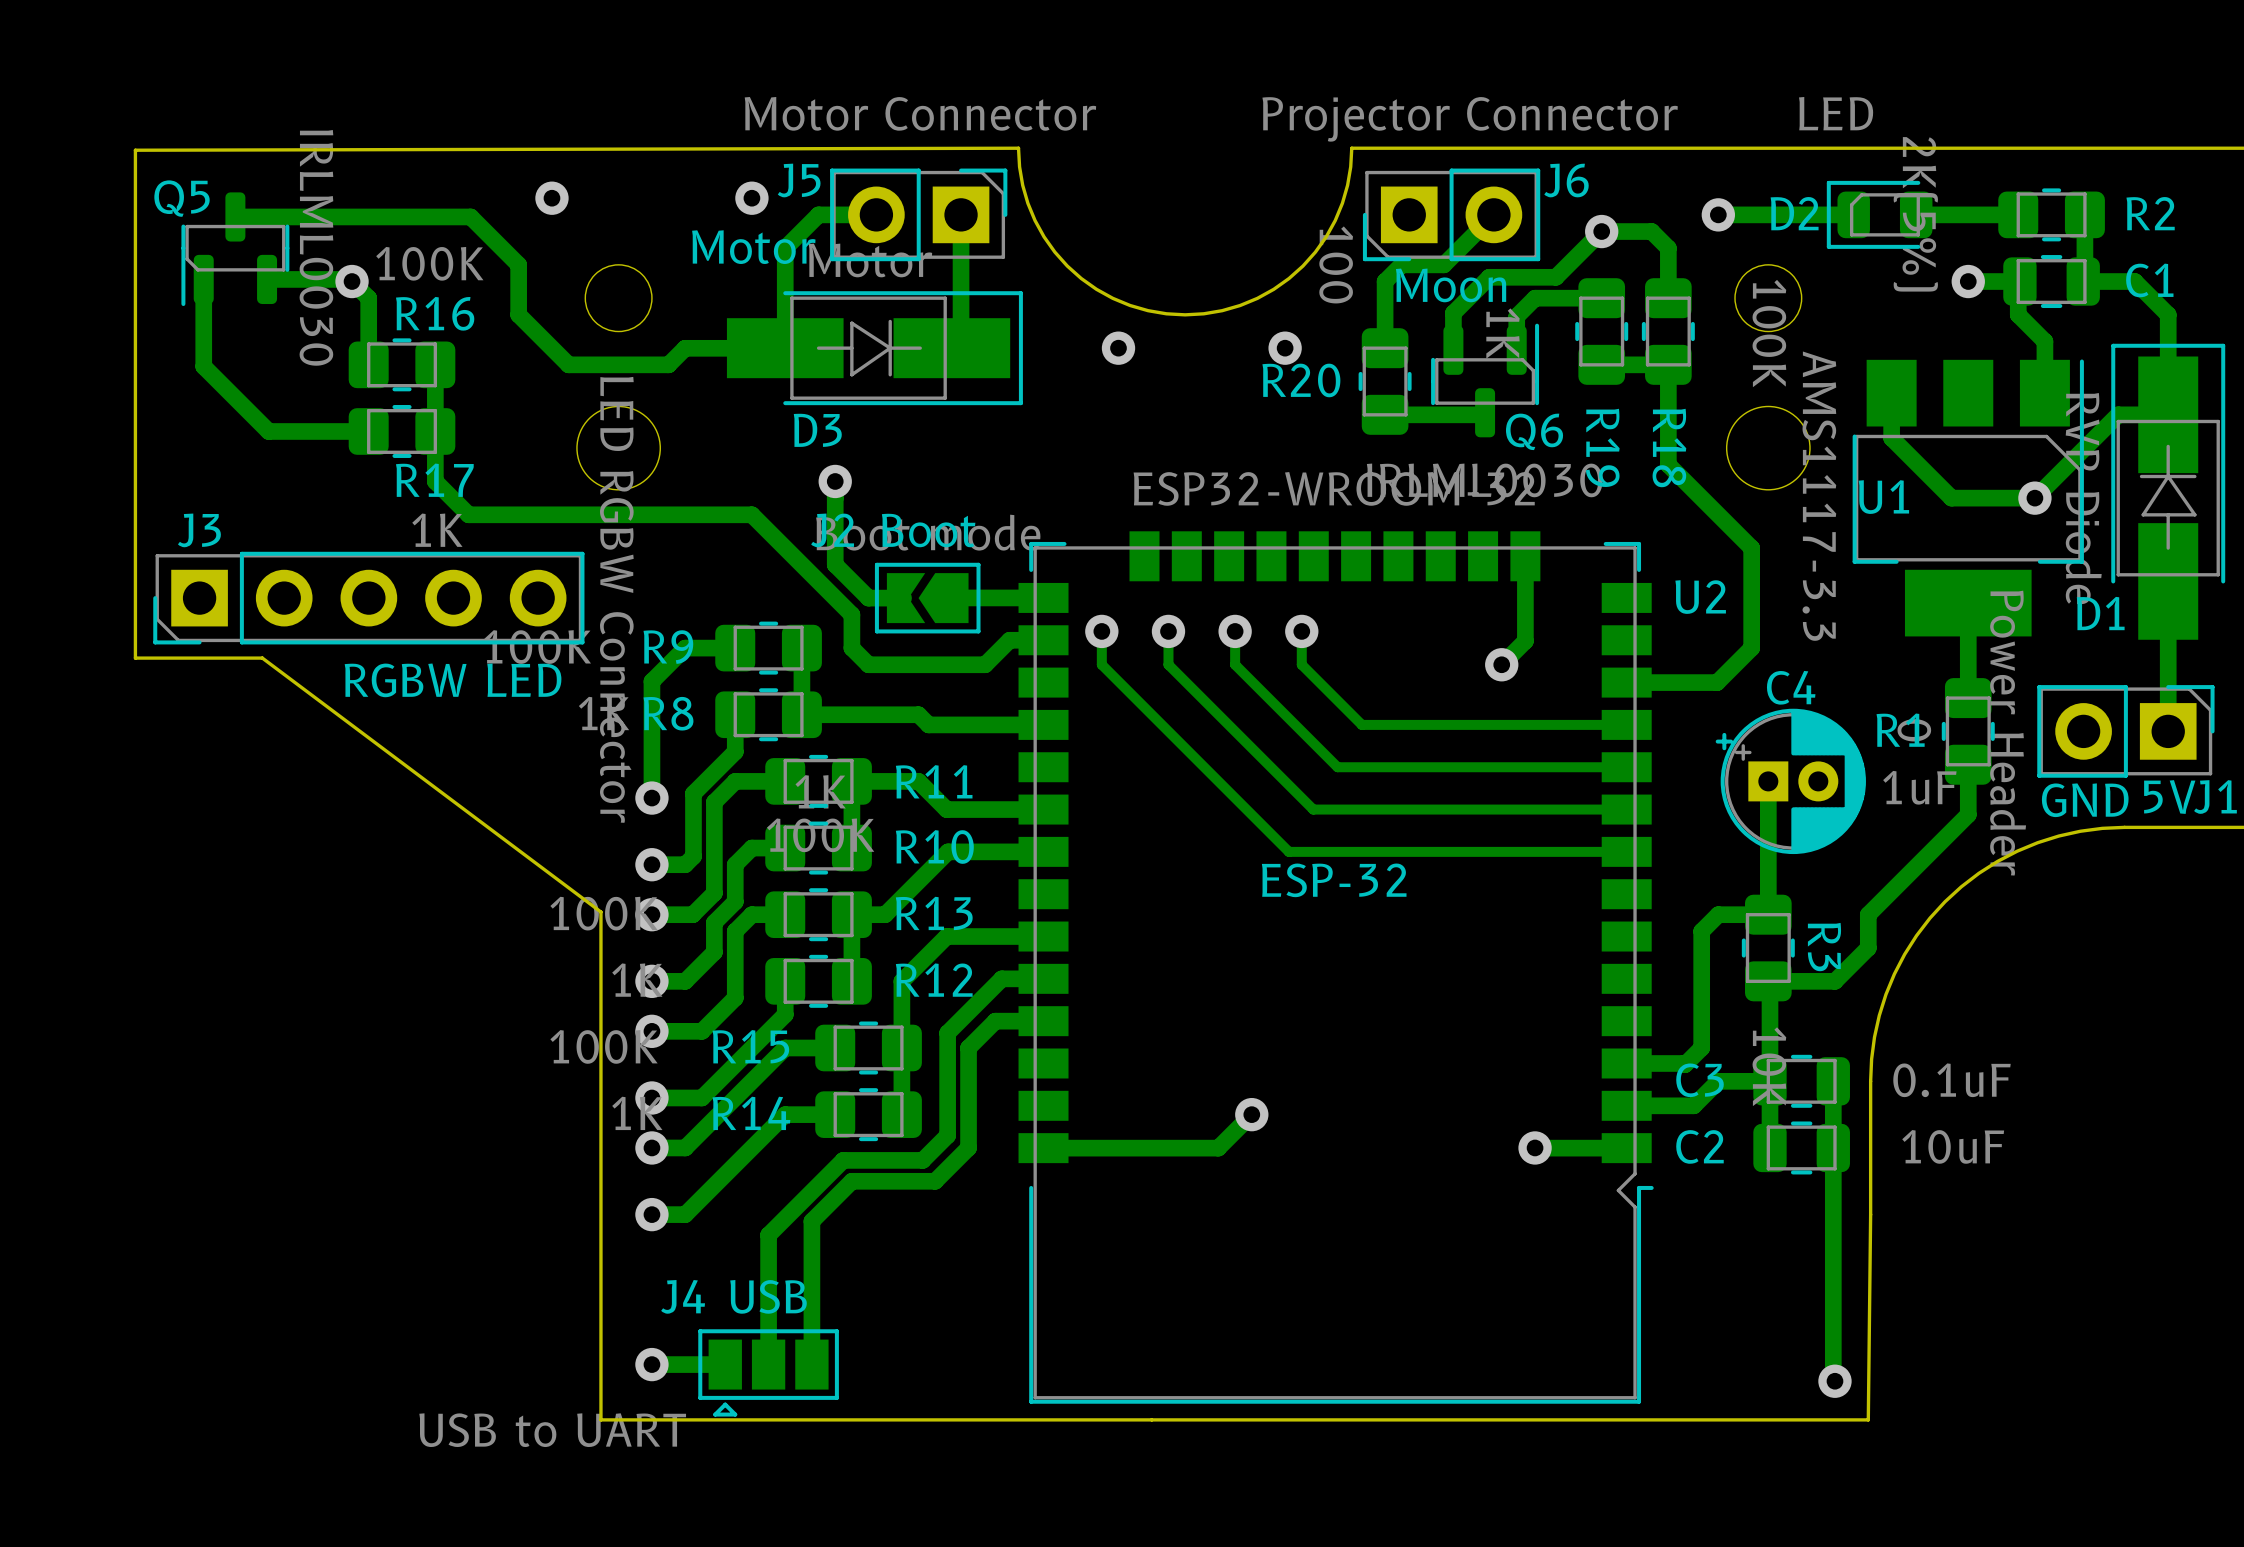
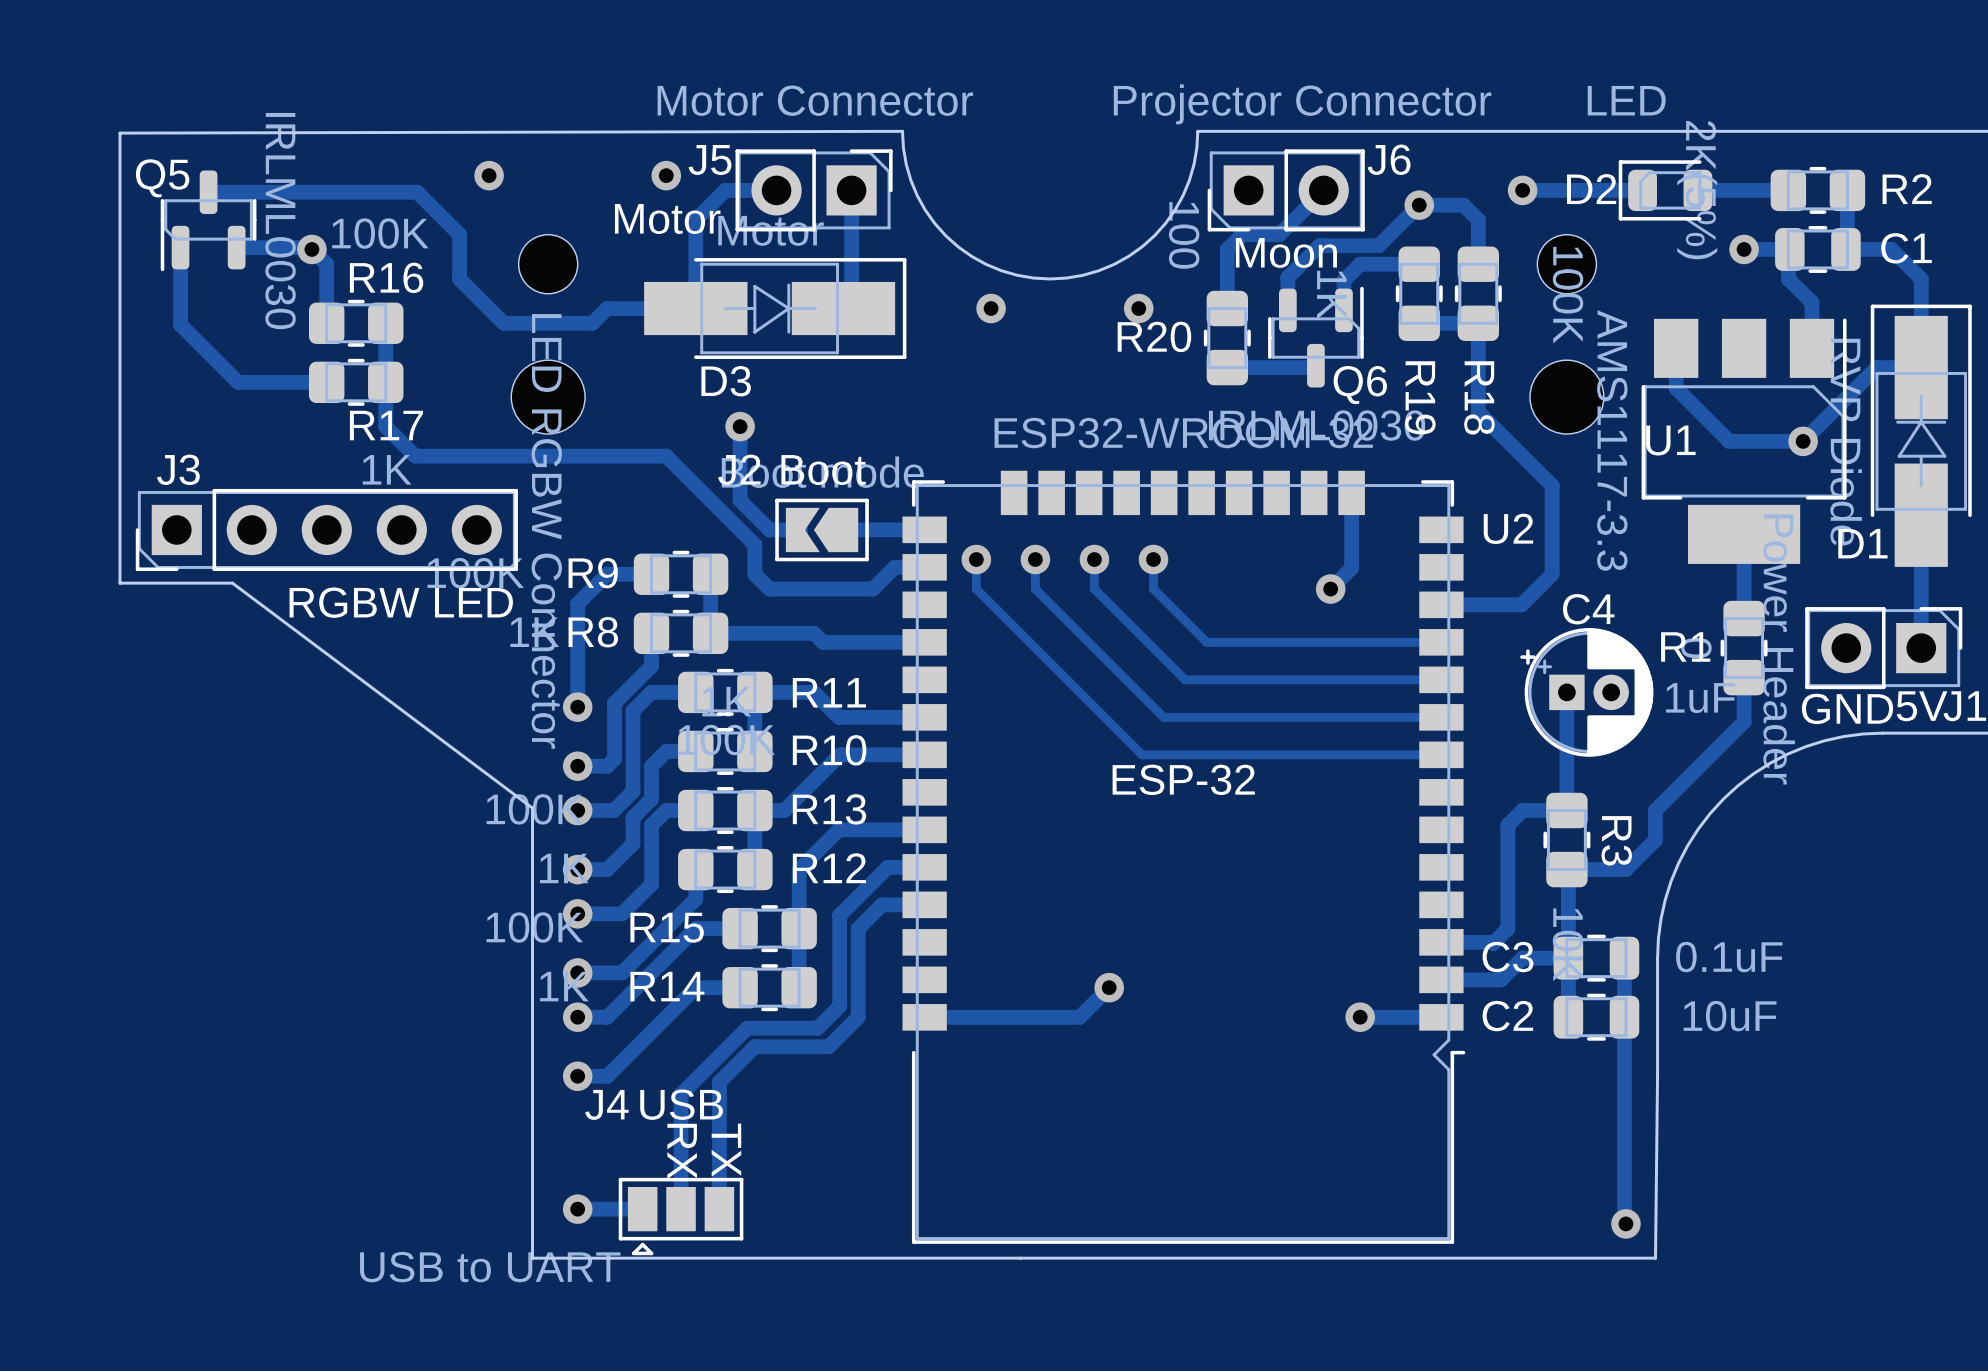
J4 text: none -> USB (681, 1104)
J4 name position: J4 (683, 1296) -> J4 (606, 1104)
J4 text: USB (768, 1296) -> RX (682, 1151)
J4 text: none -> TX (726, 1150)

